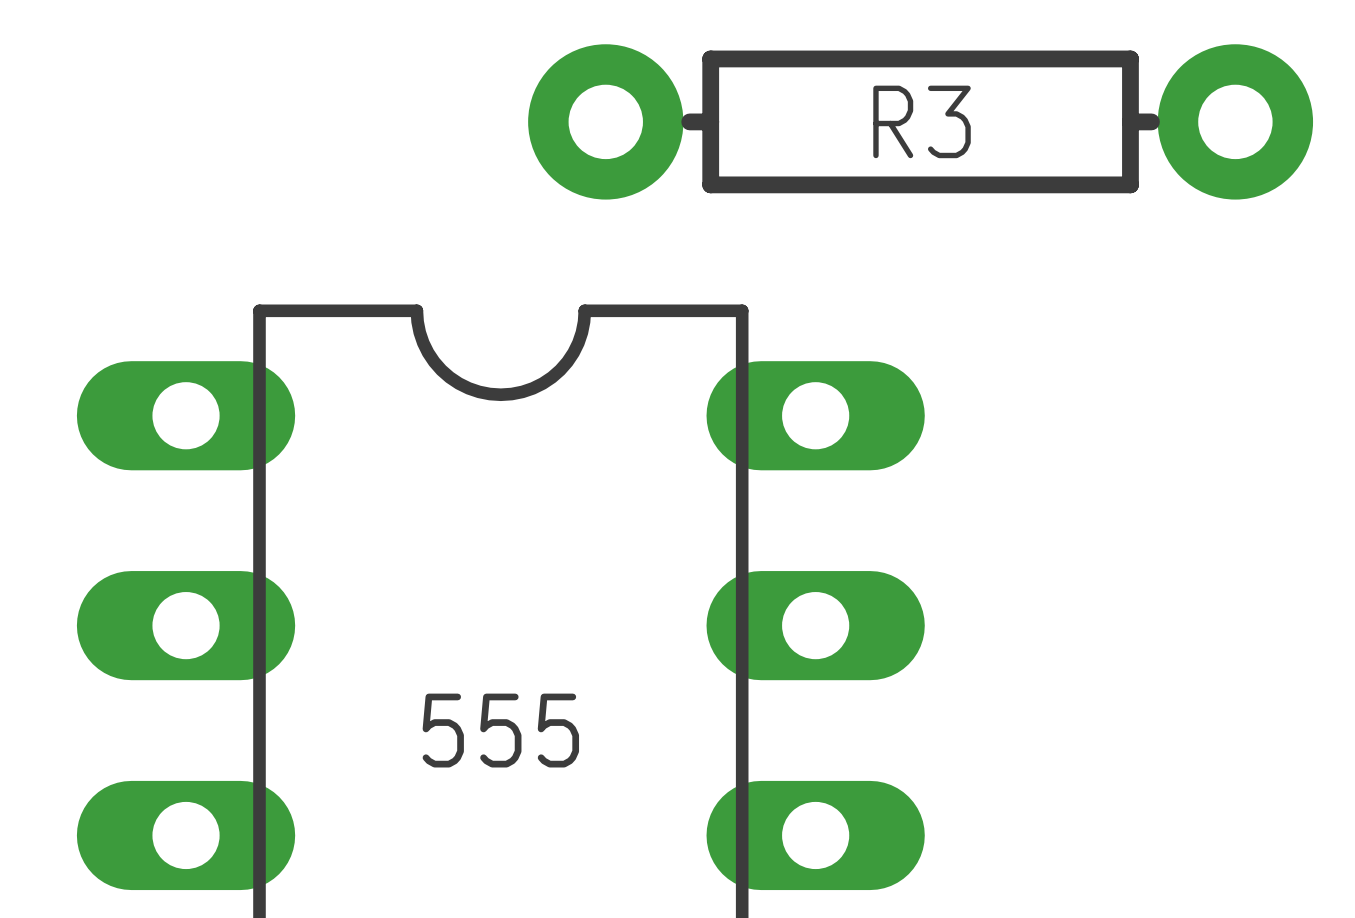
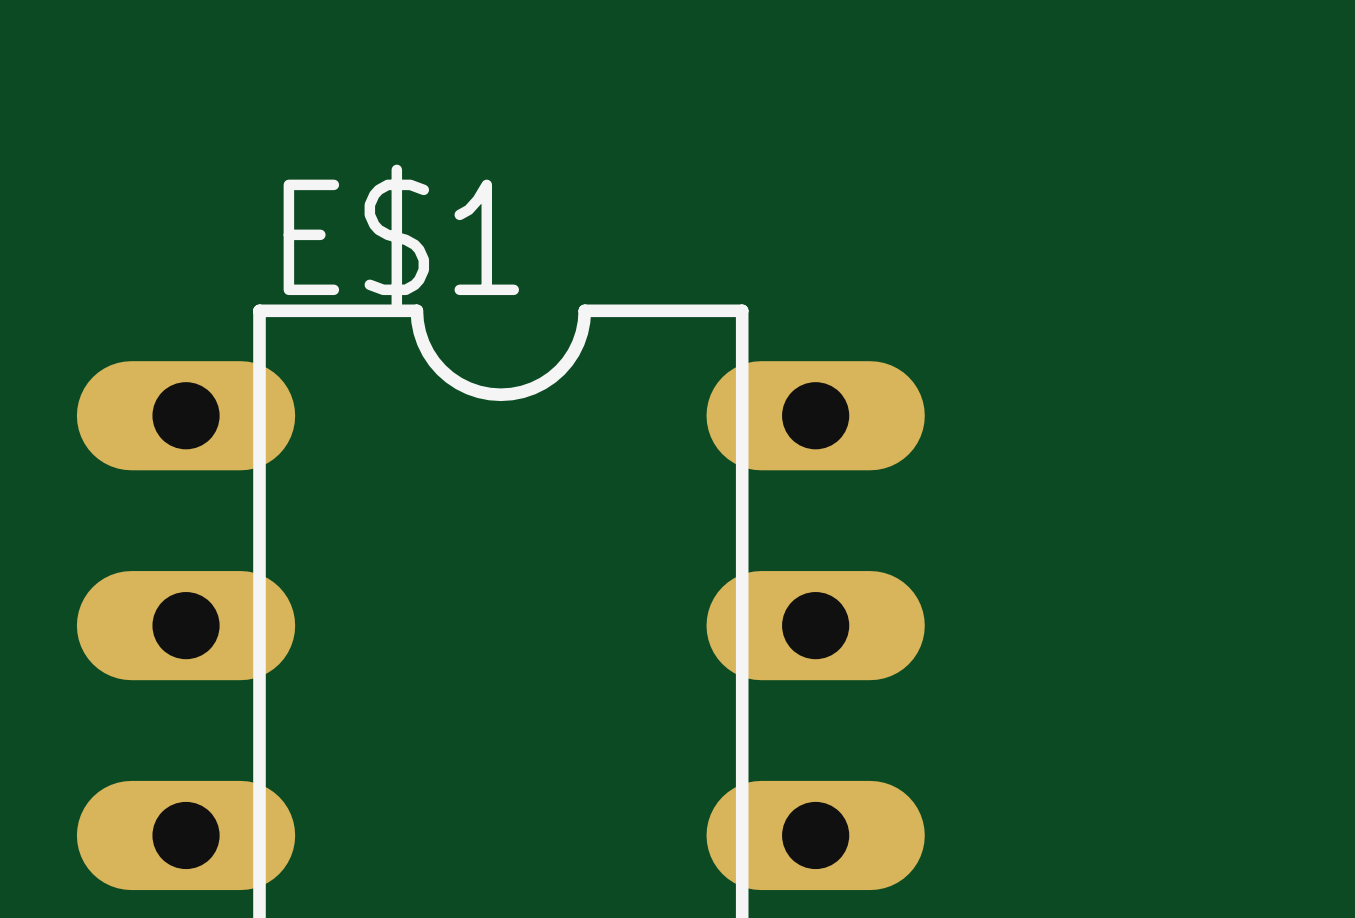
R3: (920, 121) -> none
555 name: 555 (500, 730) -> E$1 (401, 237)

